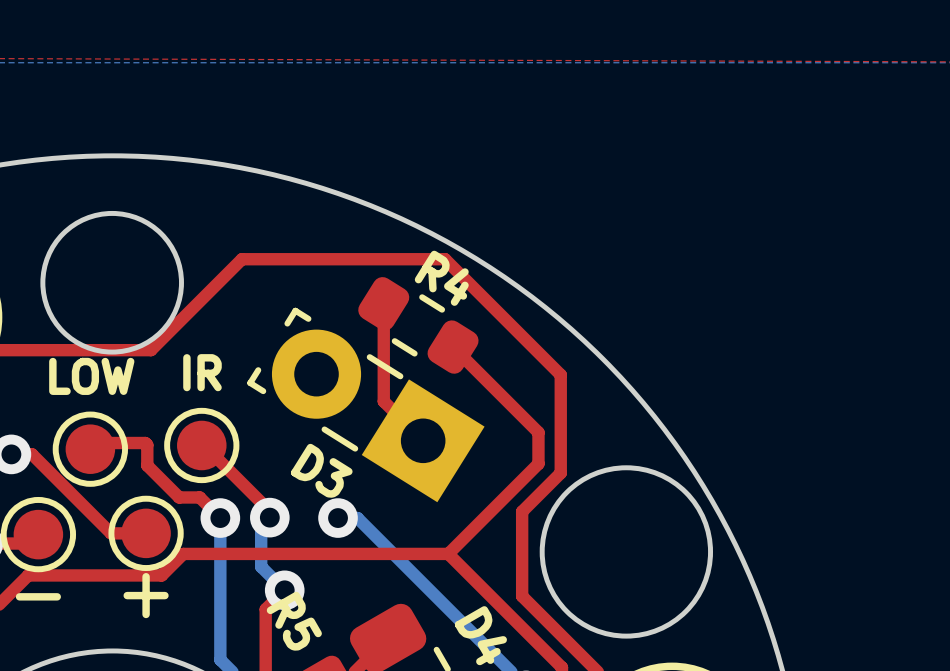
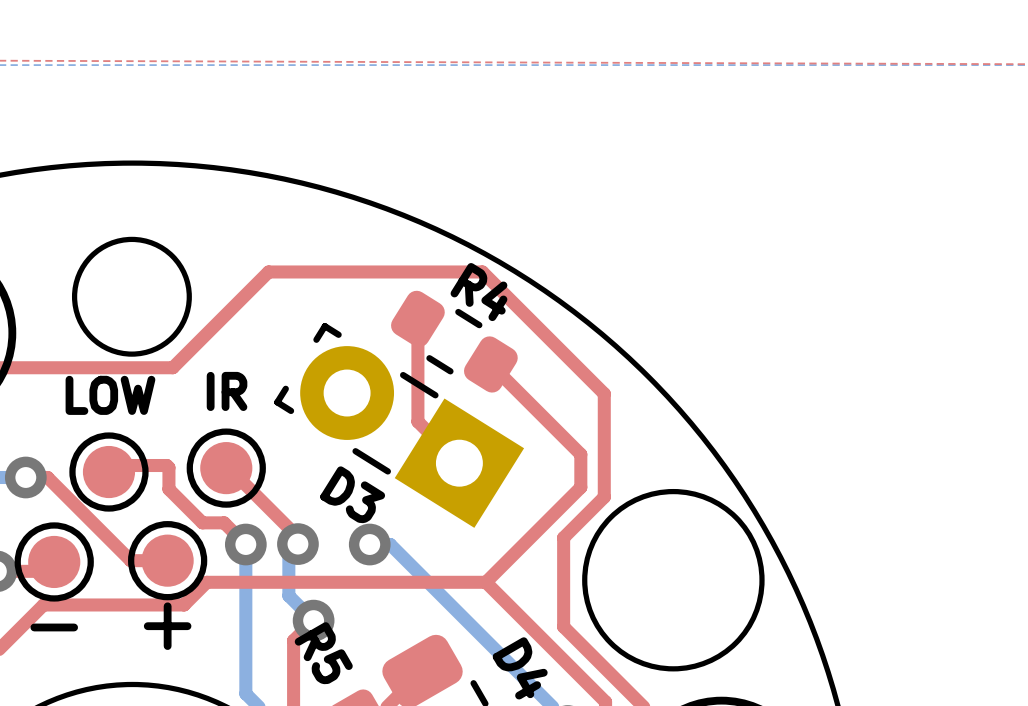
round board edge size: [40, 210, 184, 355] -> [71, 236, 192, 357]

